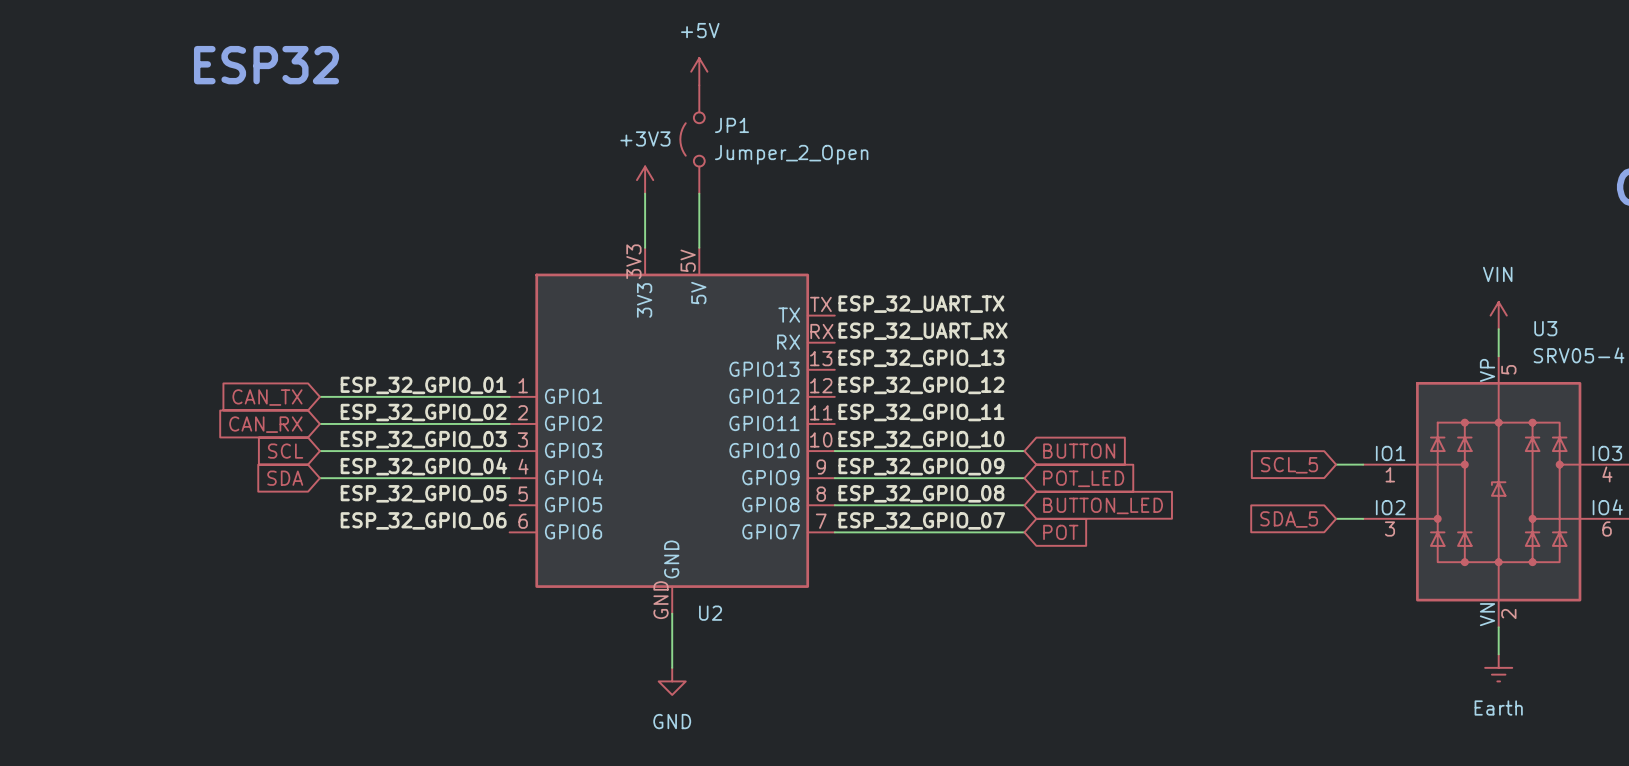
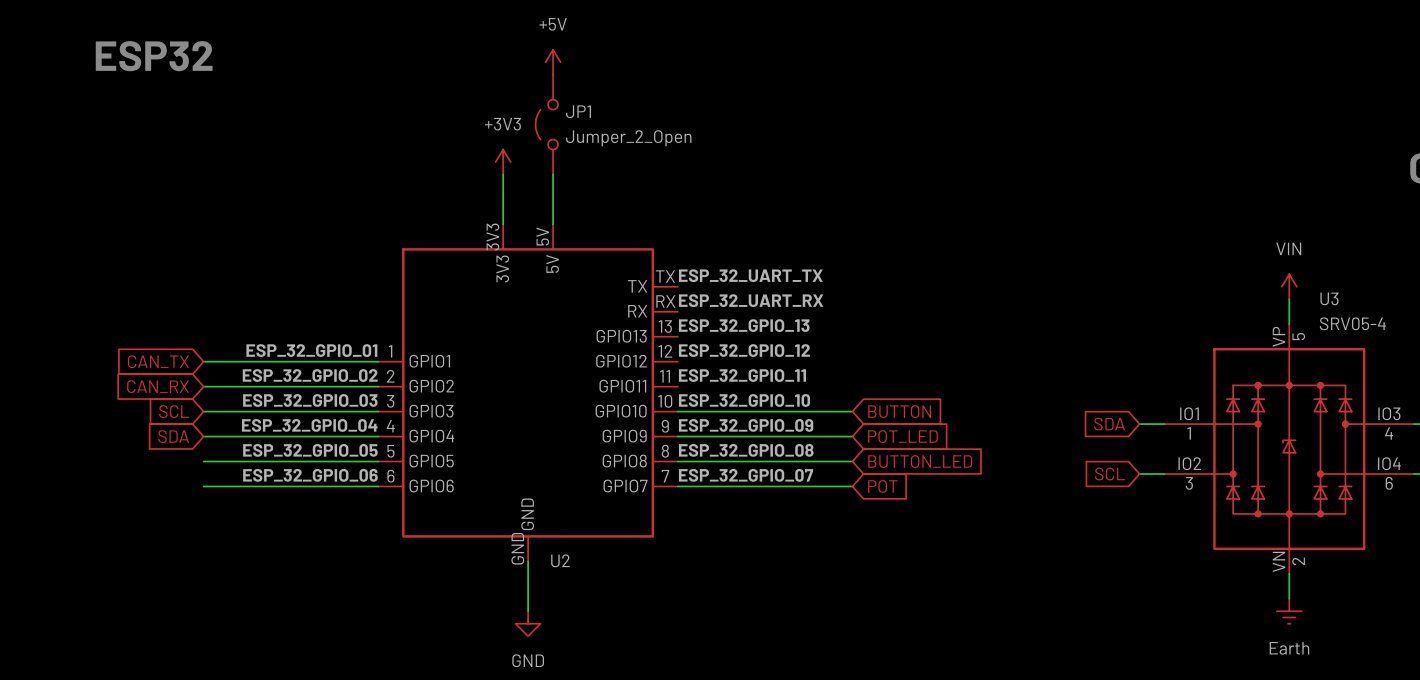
global label: SCL_5 (1289, 465) -> SDA (1109, 424)
wire: none -> (203, 461) (378, 461)
global label: SDA_5 (1289, 519) -> SCL (1109, 474)
wire: none -> (203, 486) (378, 486)

